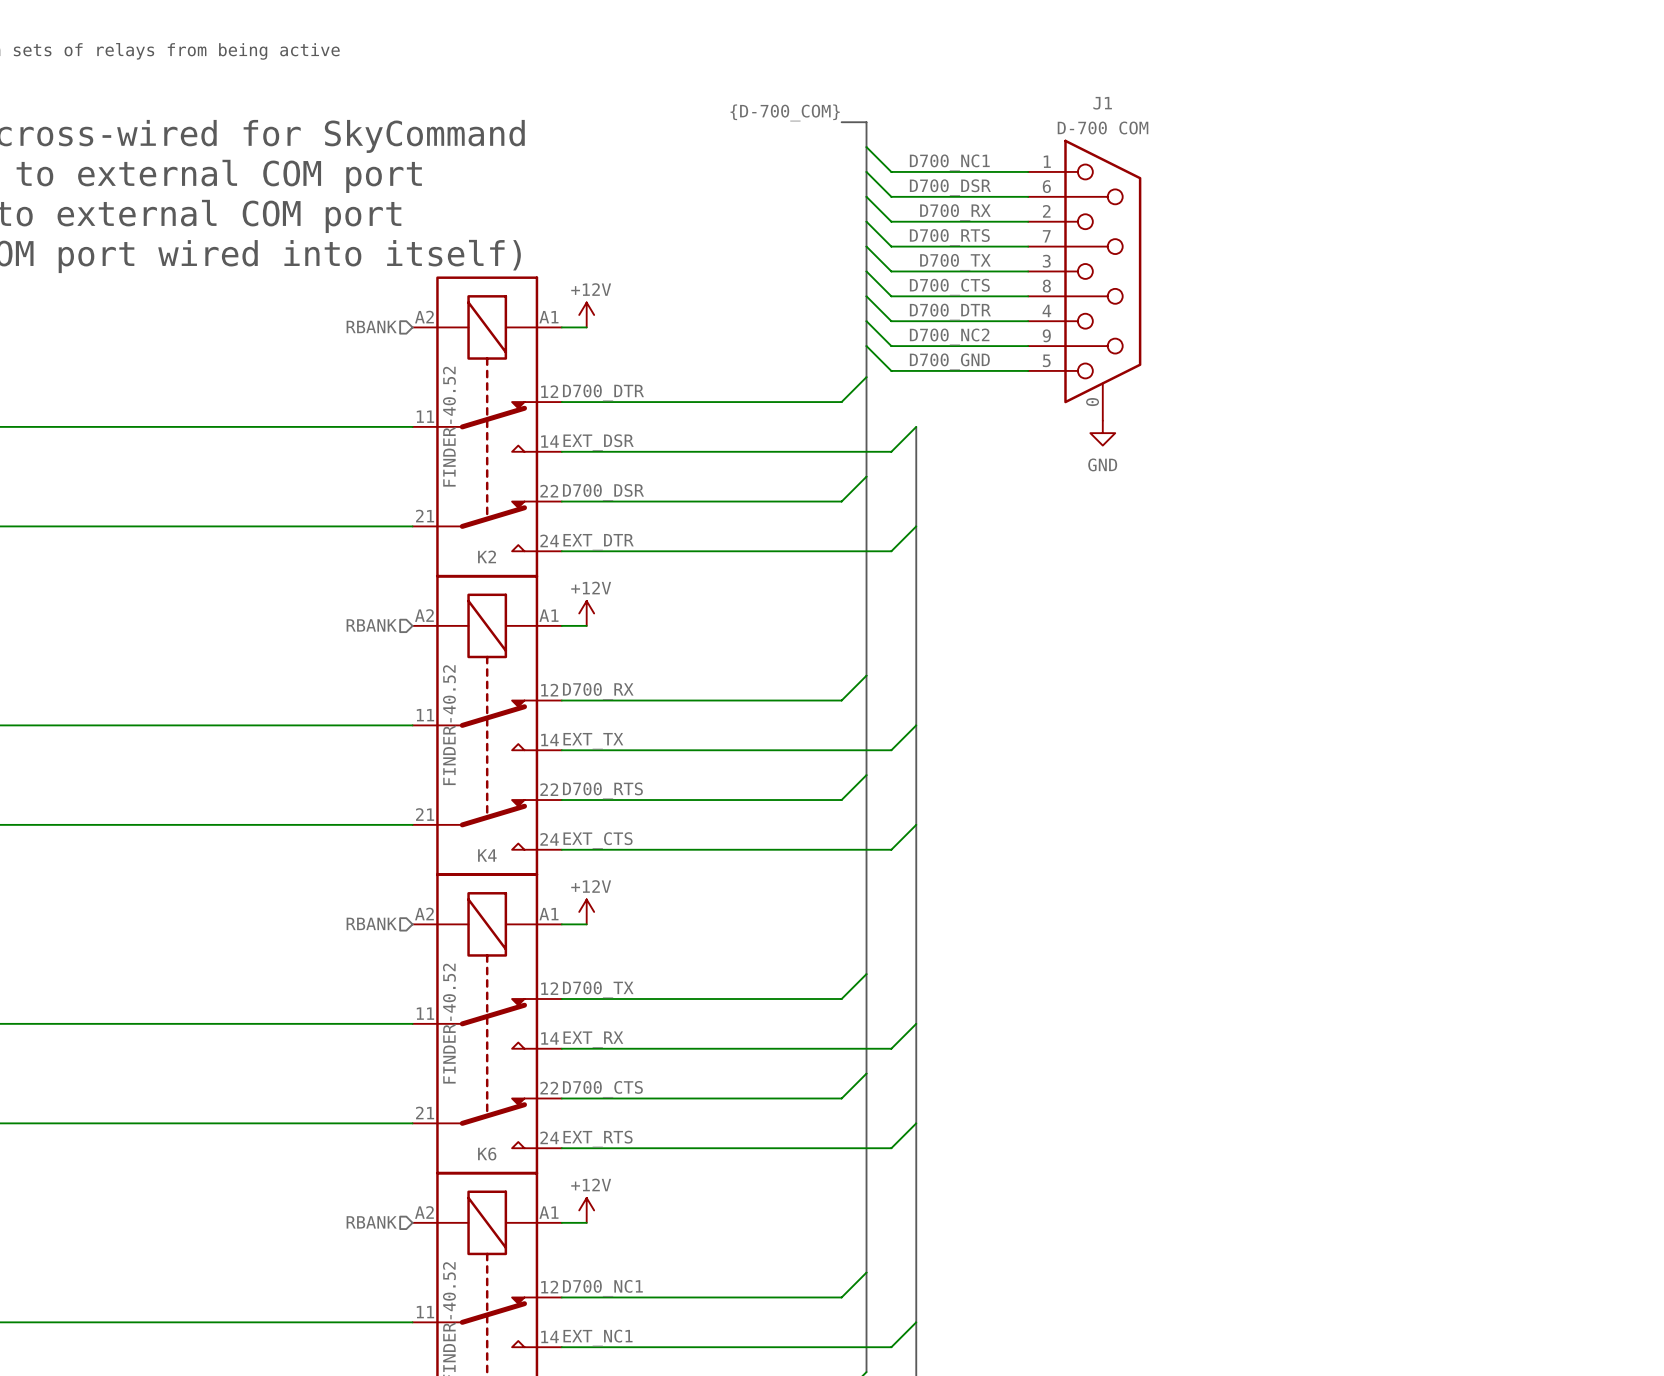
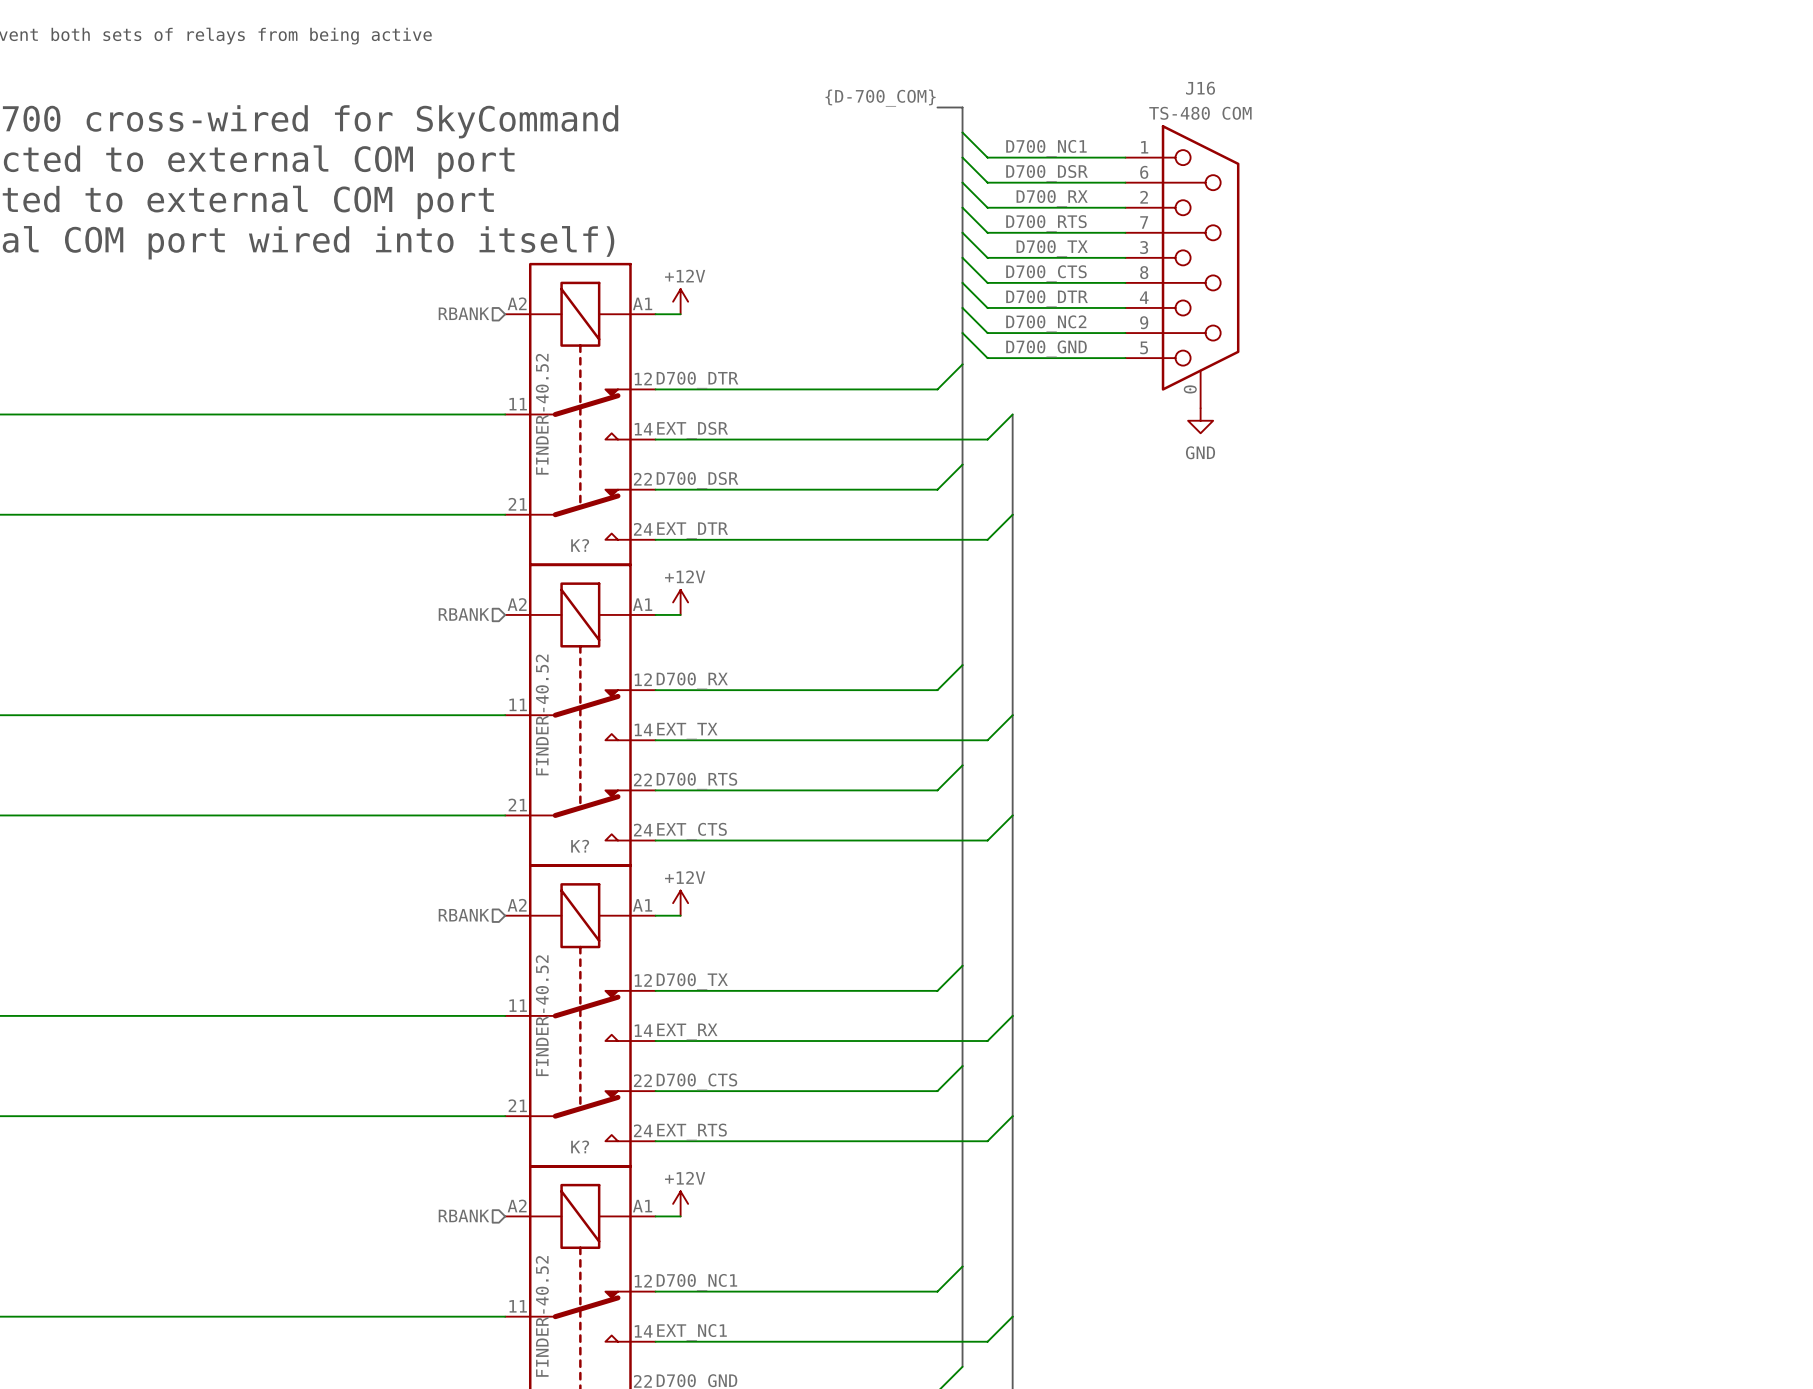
J1 name: J1 (1102, 103) -> J16 (1200, 88)
J1 value: D-700 COM (1103, 127) -> TS-480 COM (1200, 113)
K2 name: K2 (487, 556) -> K? (580, 545)
K4 name: K4 (487, 855) -> K? (580, 846)
K6 name: K6 (487, 1153) -> K? (580, 1146)

